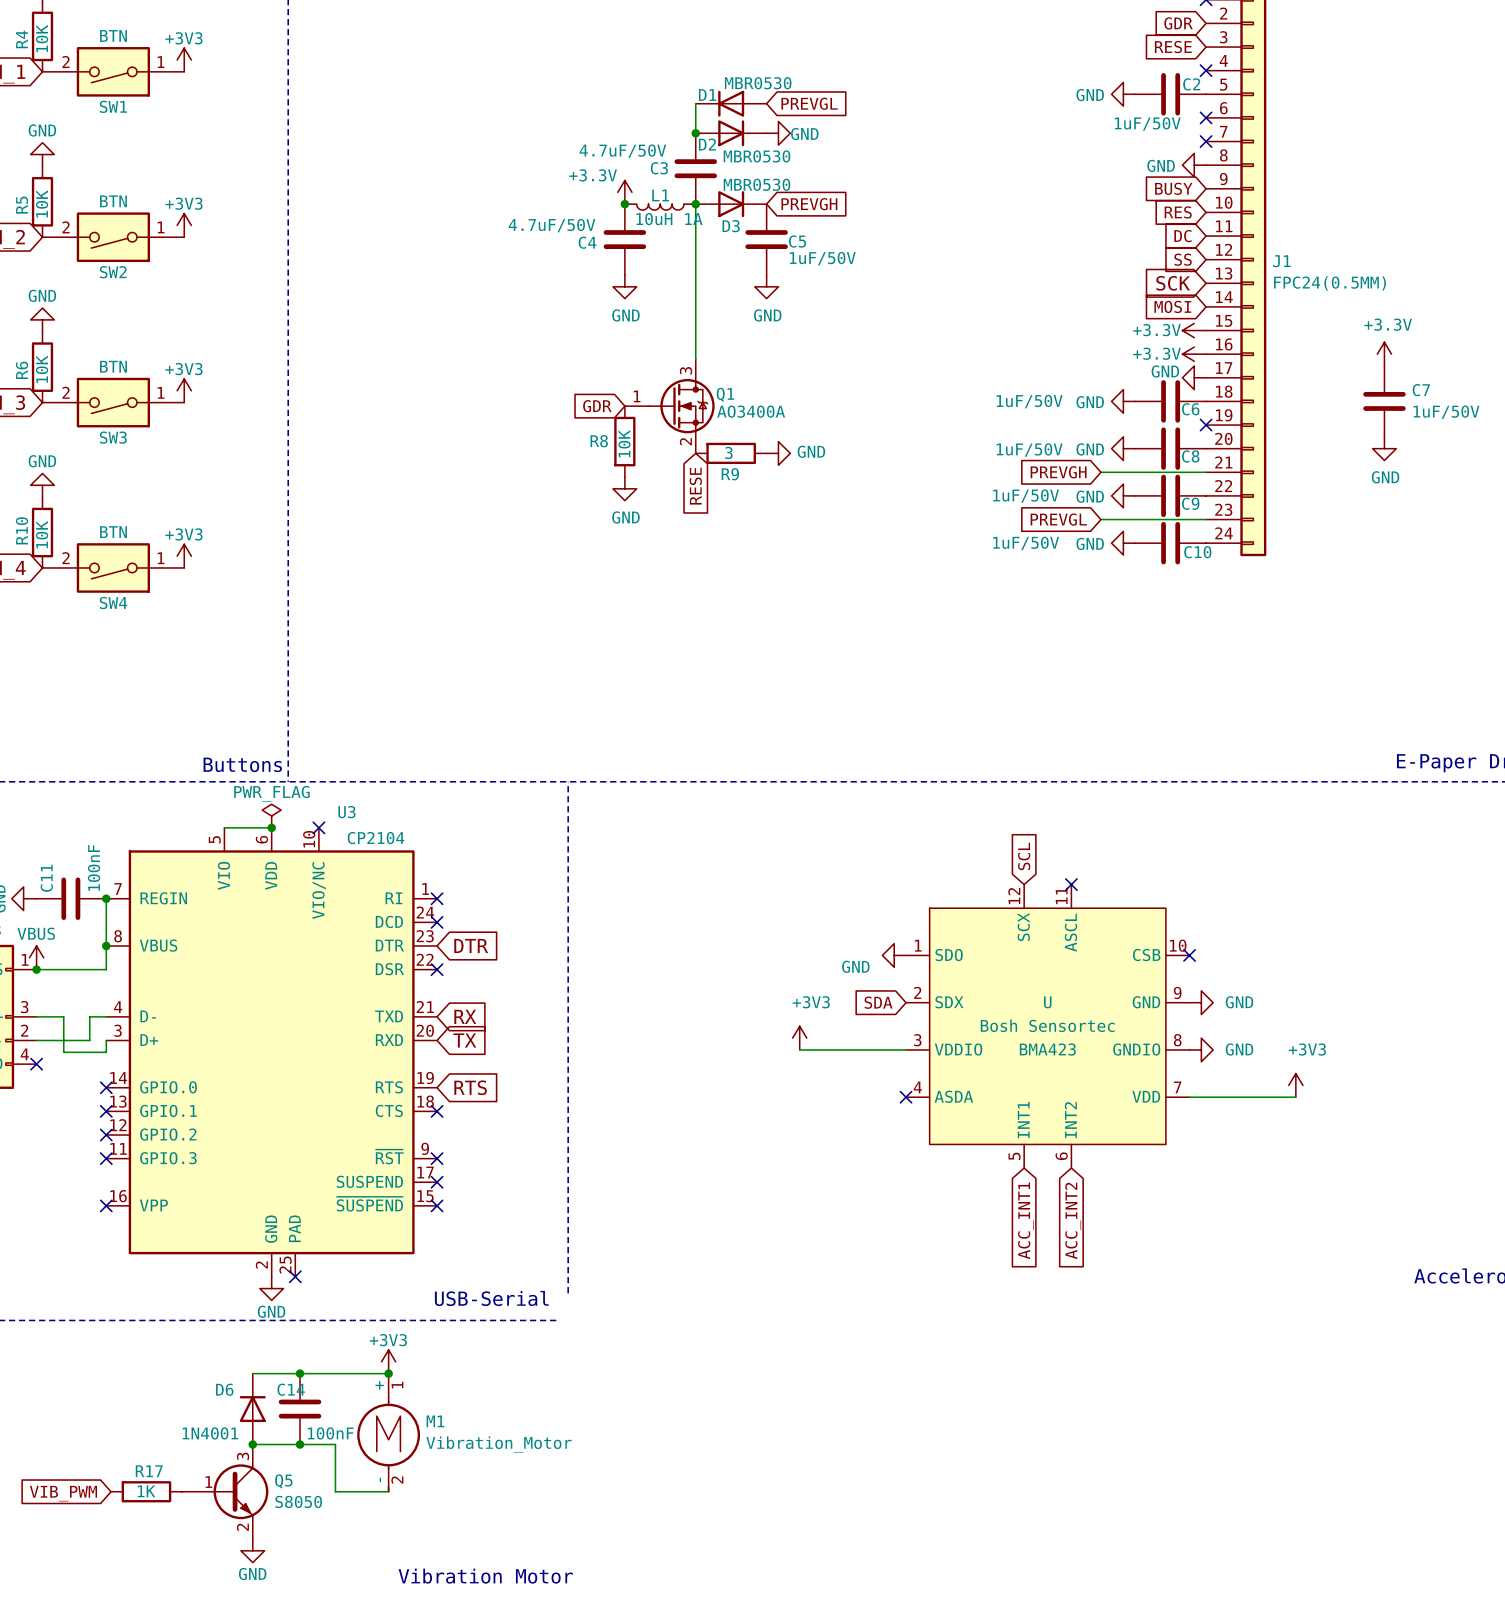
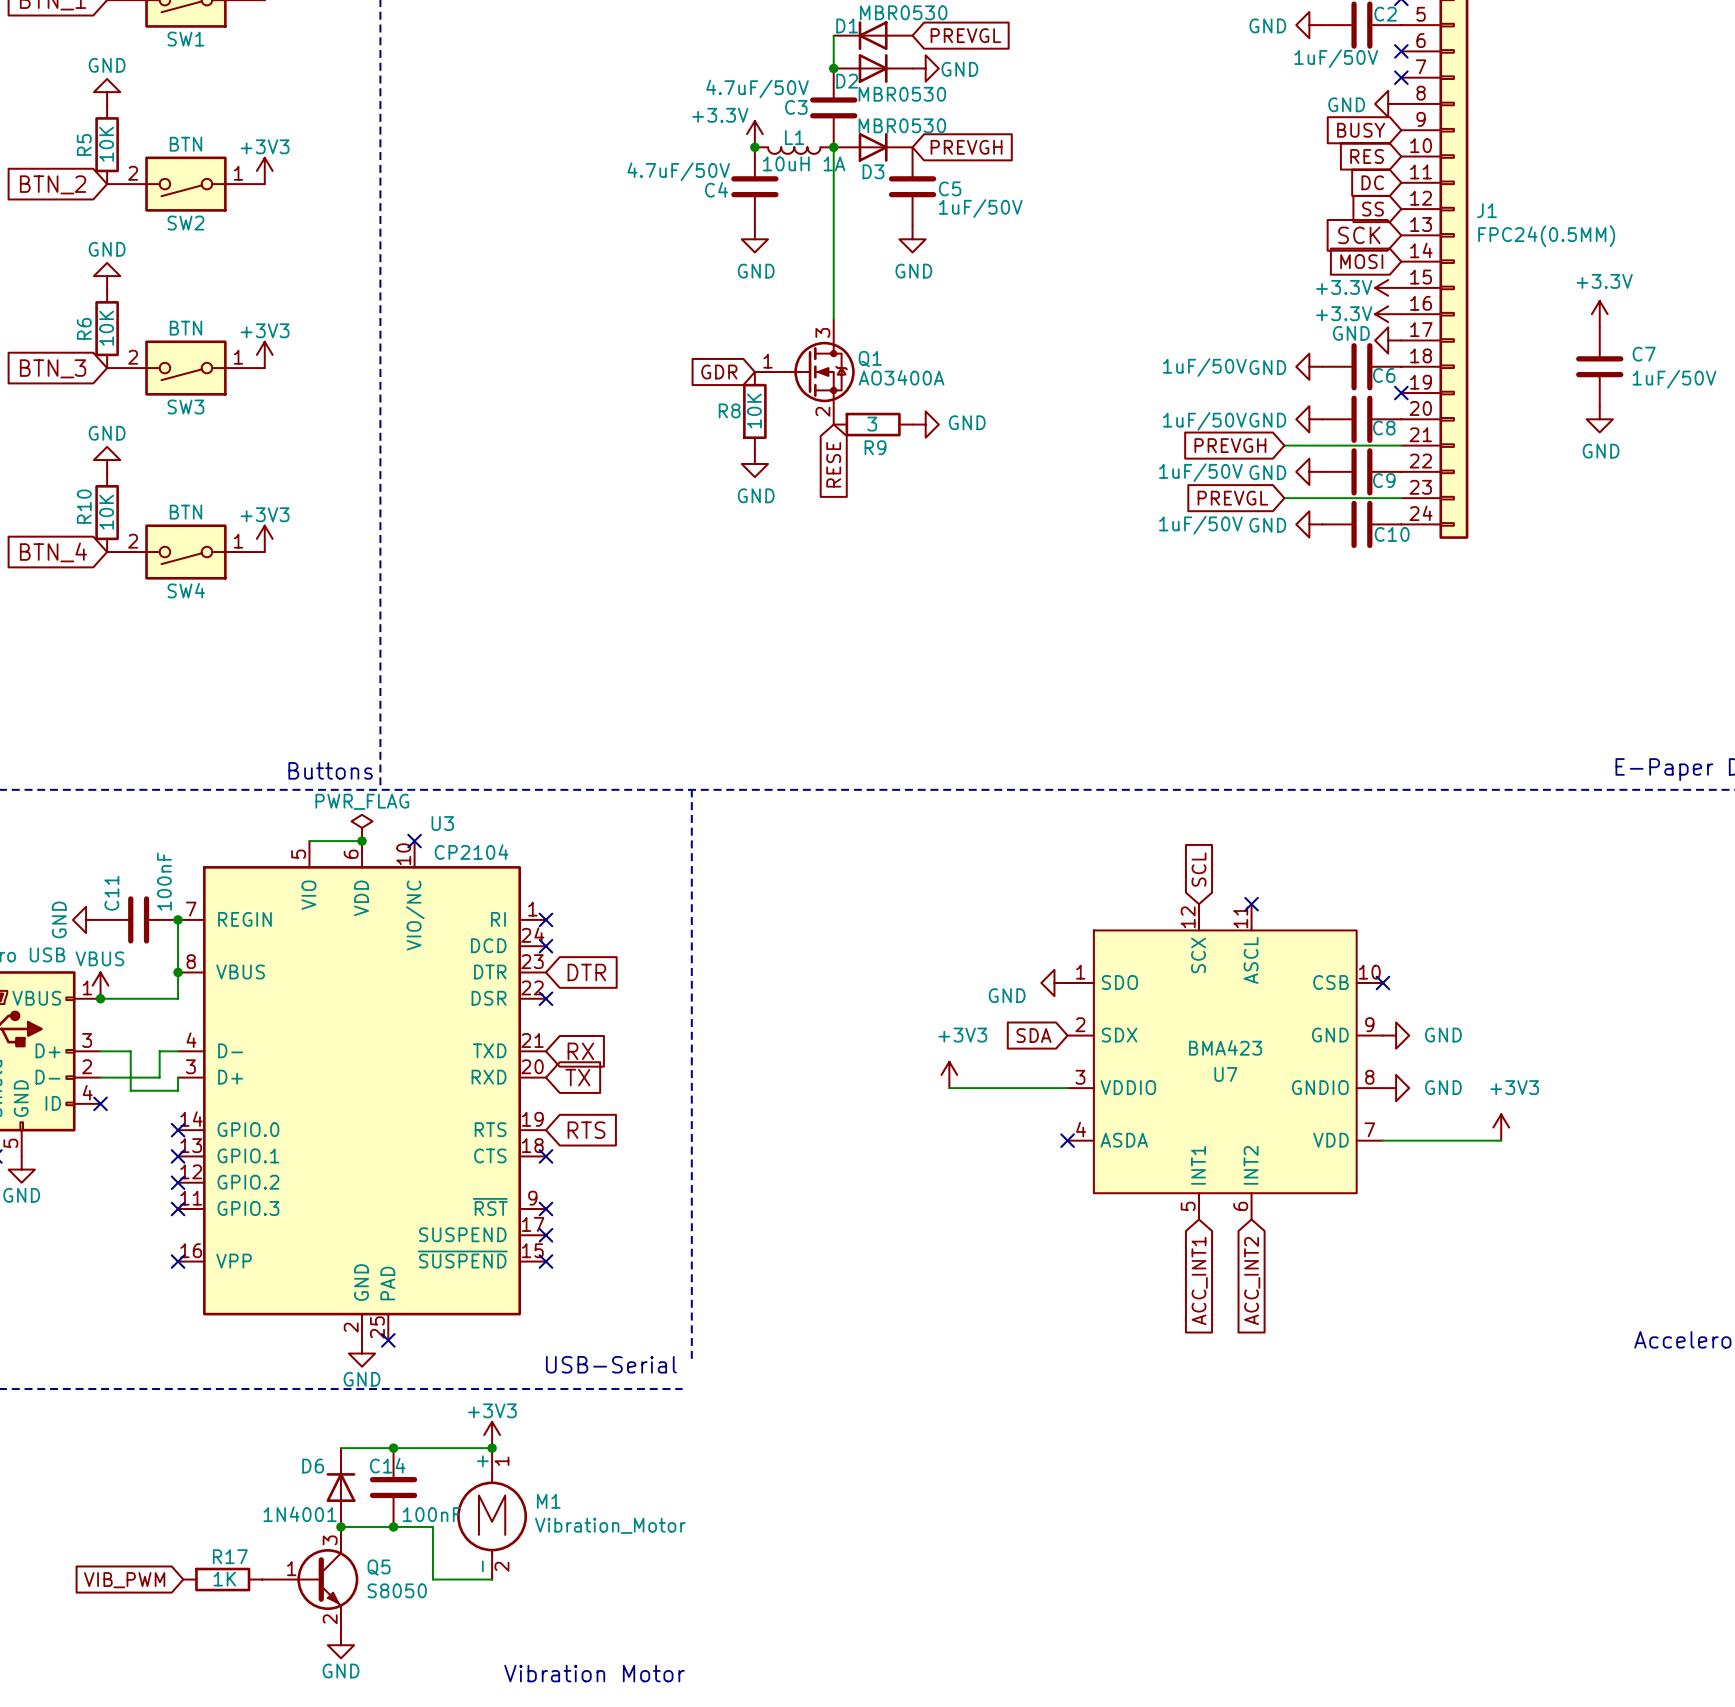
U name: U (1047, 1002) -> U7 (1225, 1074)
U text: Bosh Sensortec (1047, 1025) -> none
U value position: BMA423 (1047, 1049) -> BMA423 (1225, 1047)

